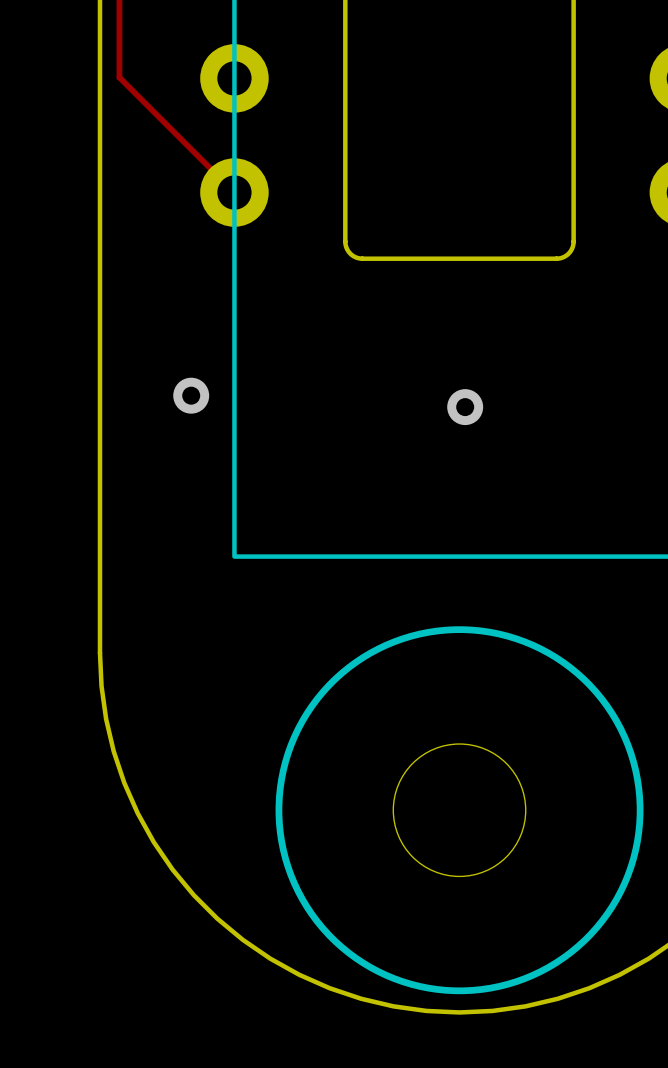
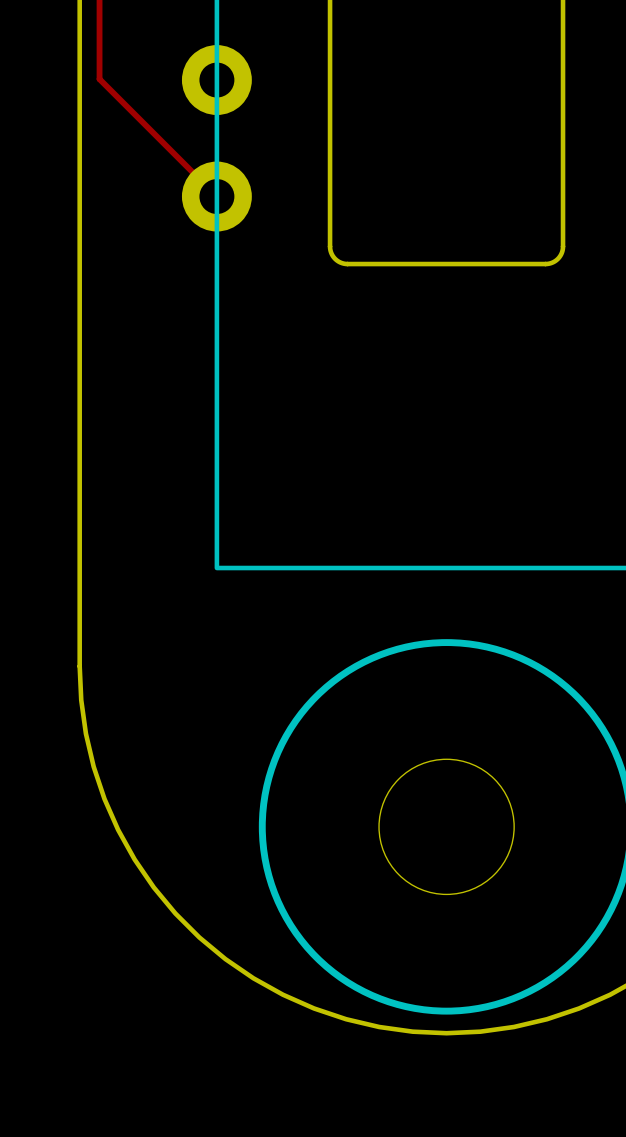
via: (191, 395) -> none
via: (465, 407) -> none

